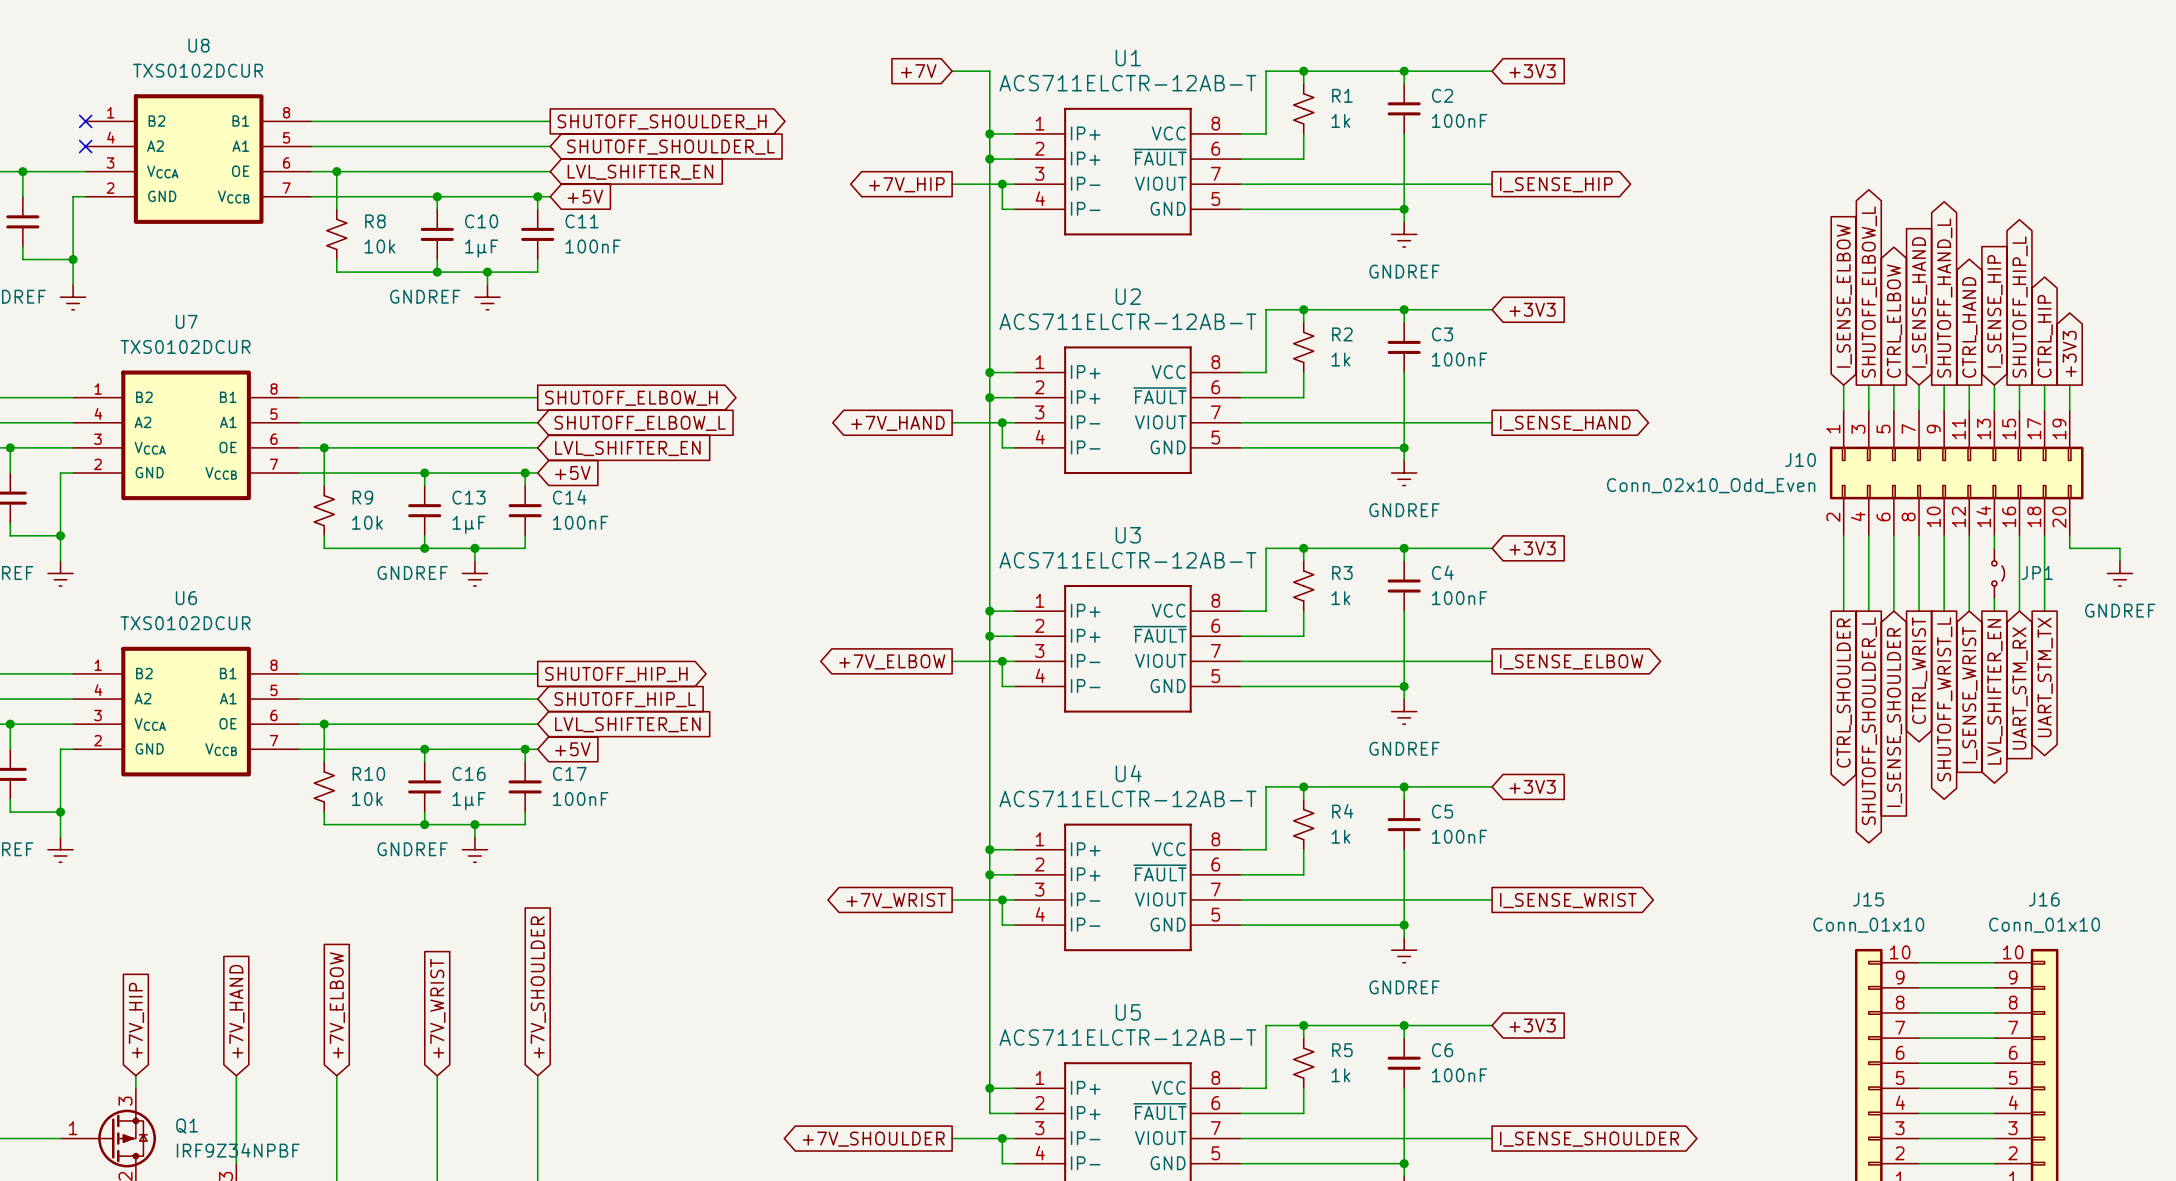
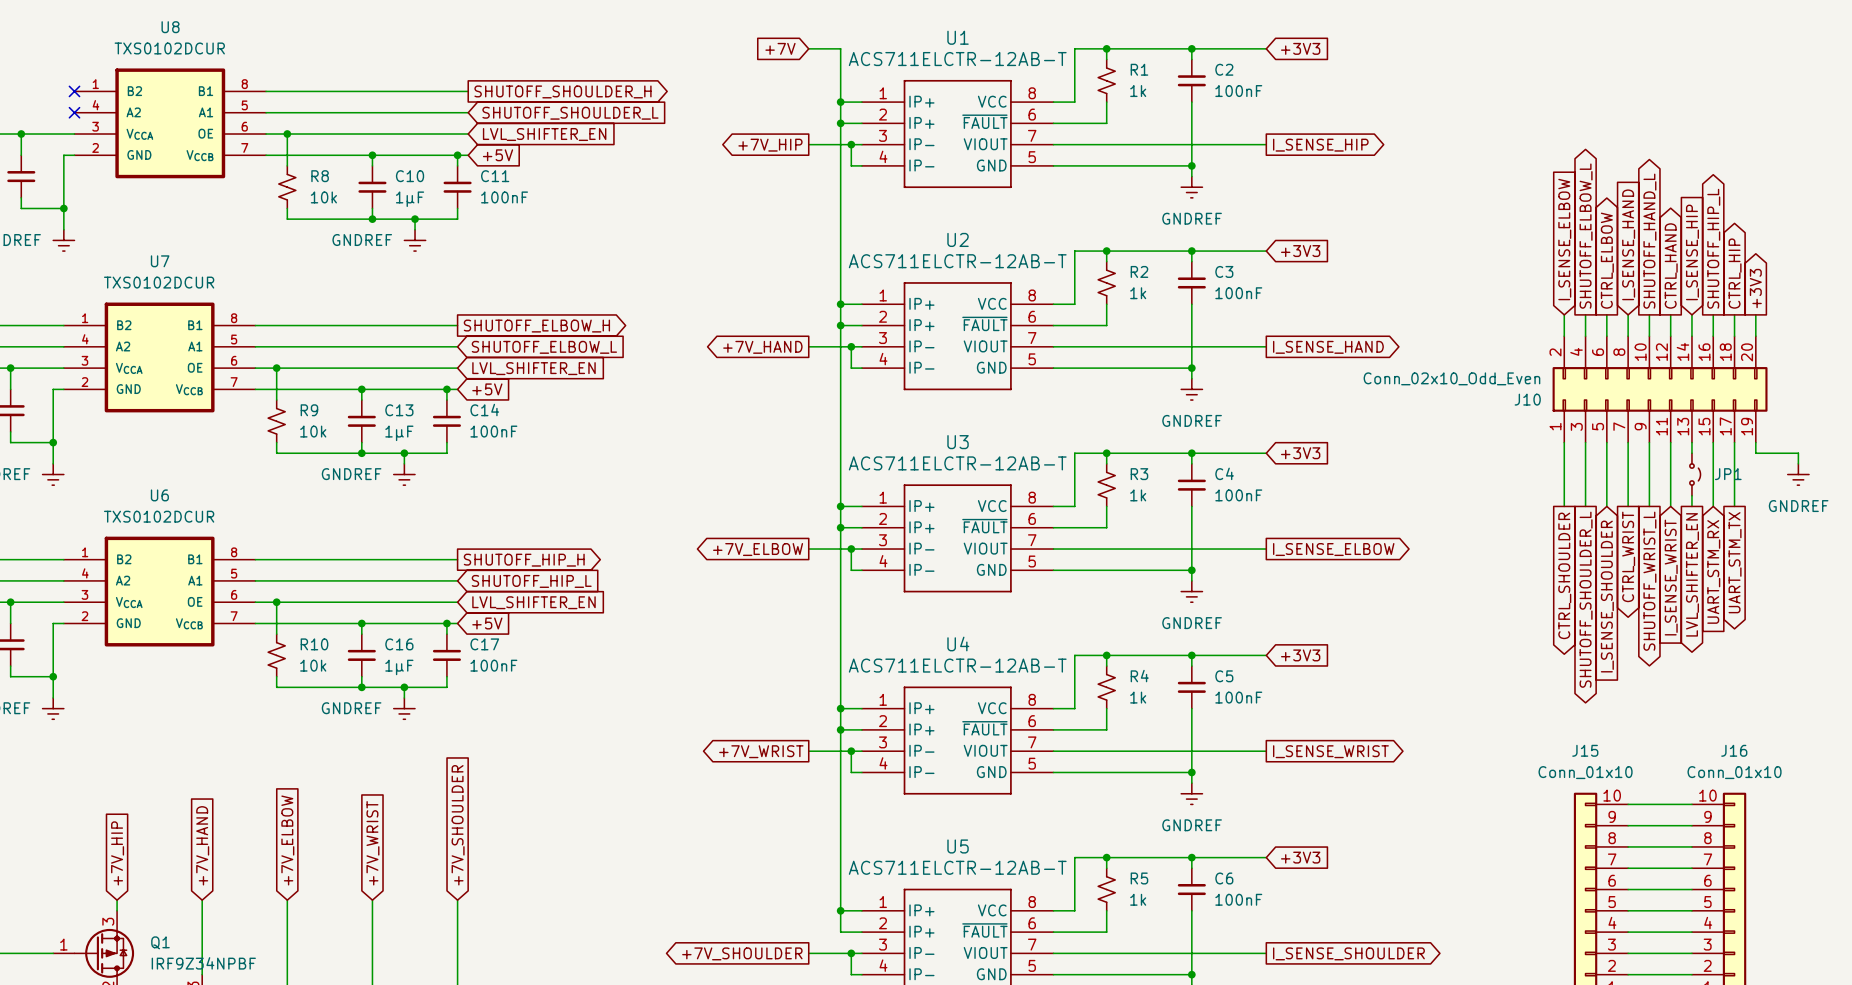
J10 flip: as is (1956, 473) -> up-down (1660, 389)

